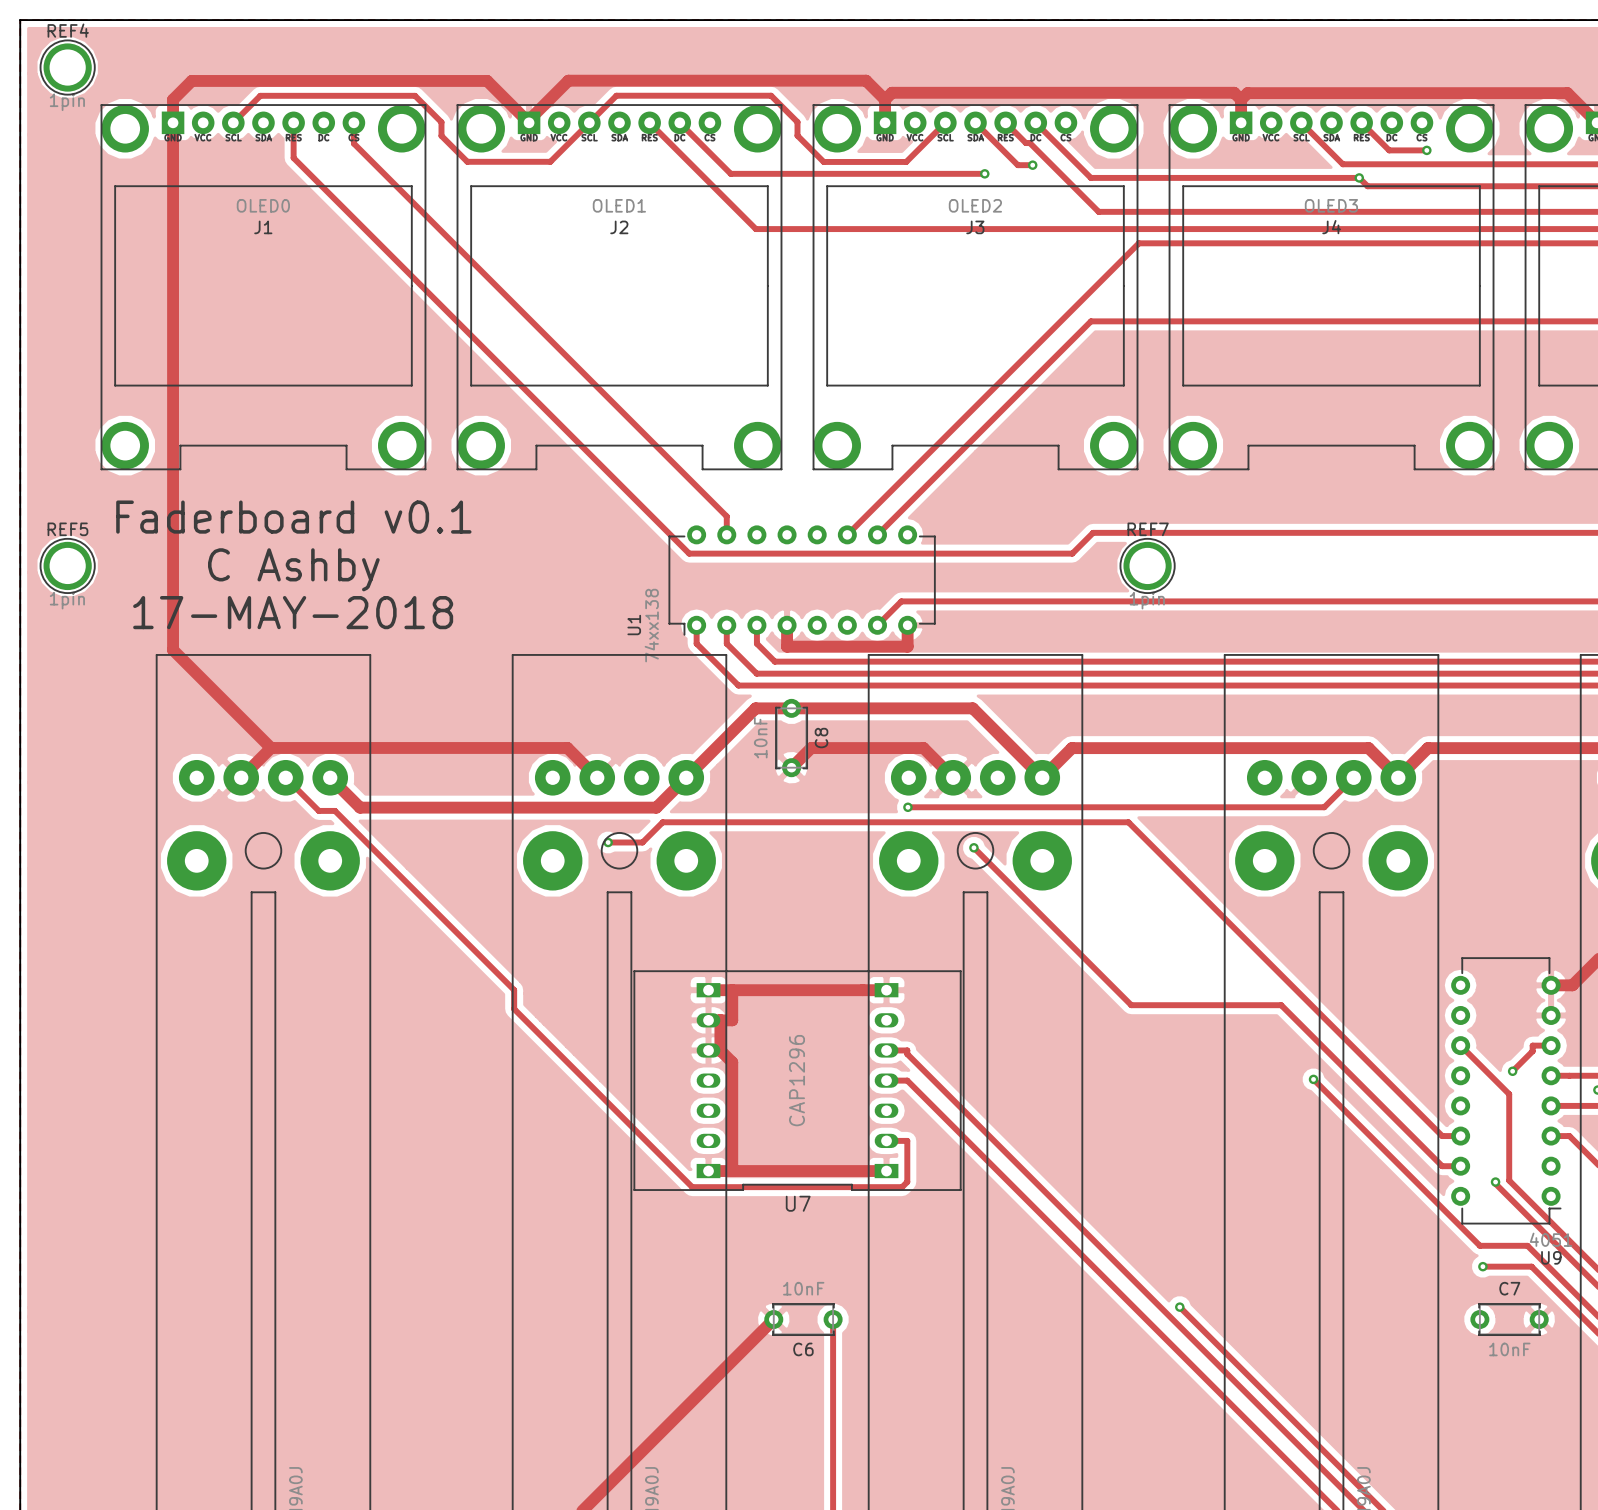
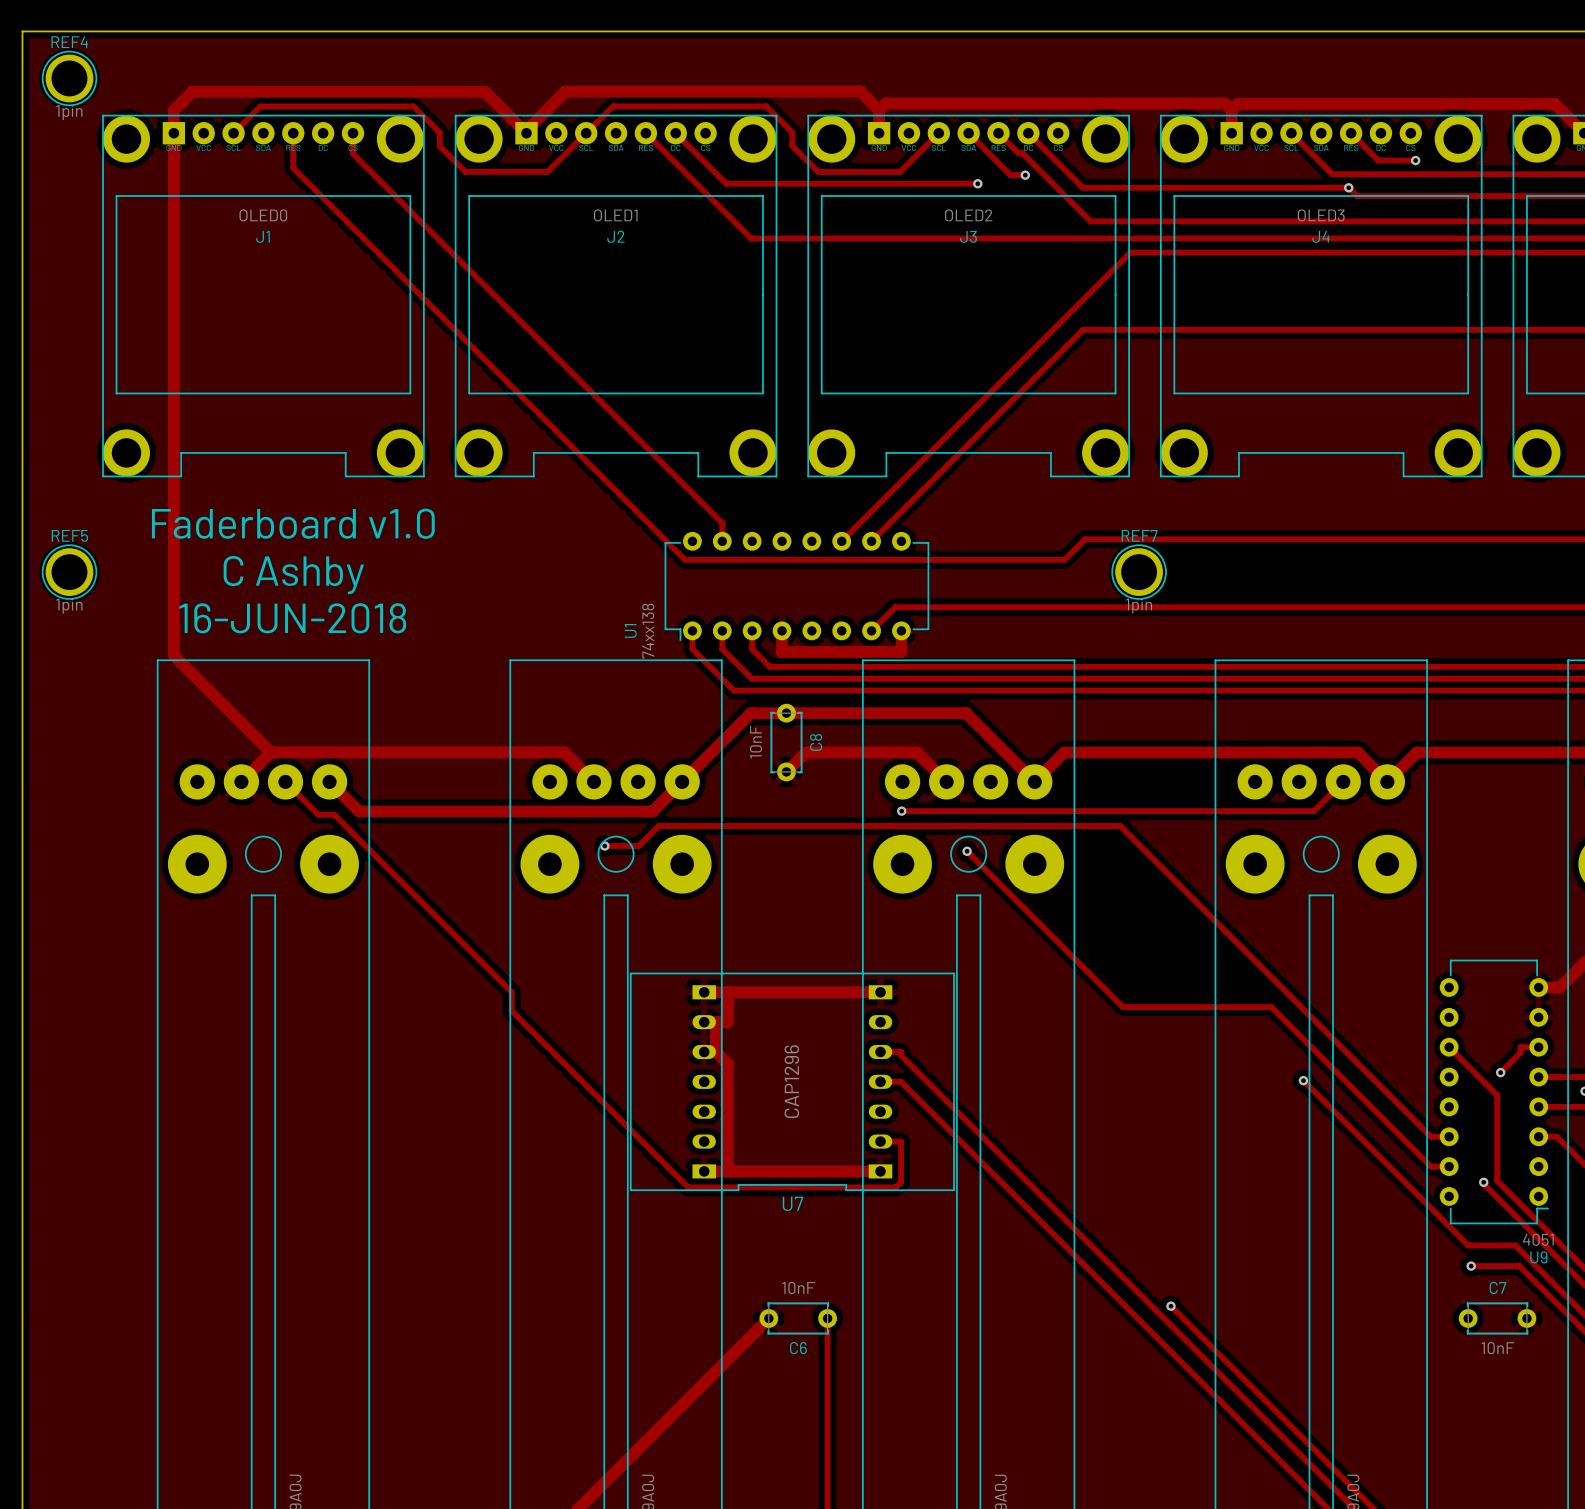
text: Faderboard v0.1 (293, 517) -> Faderboard v1.0 (293, 523)
text: 17-MAY-2018 (293, 612) -> 16-JUN-2018 (292, 618)

